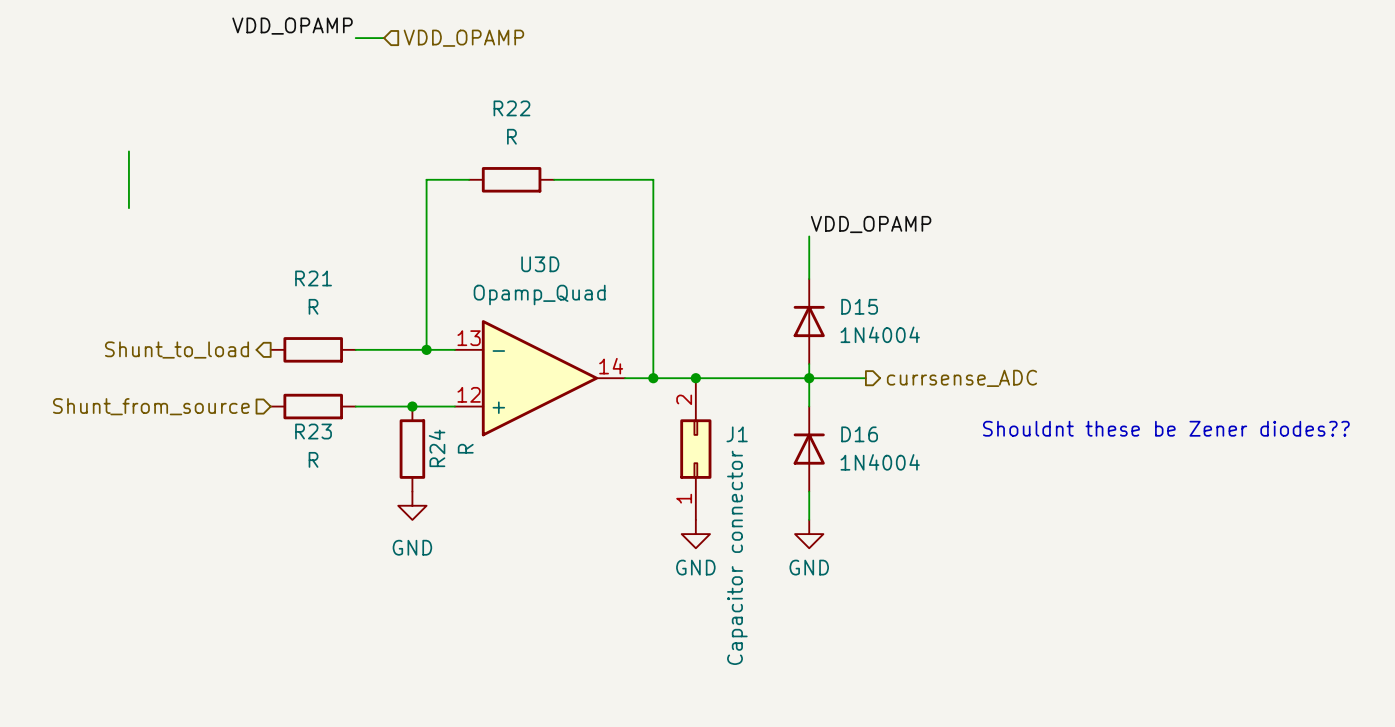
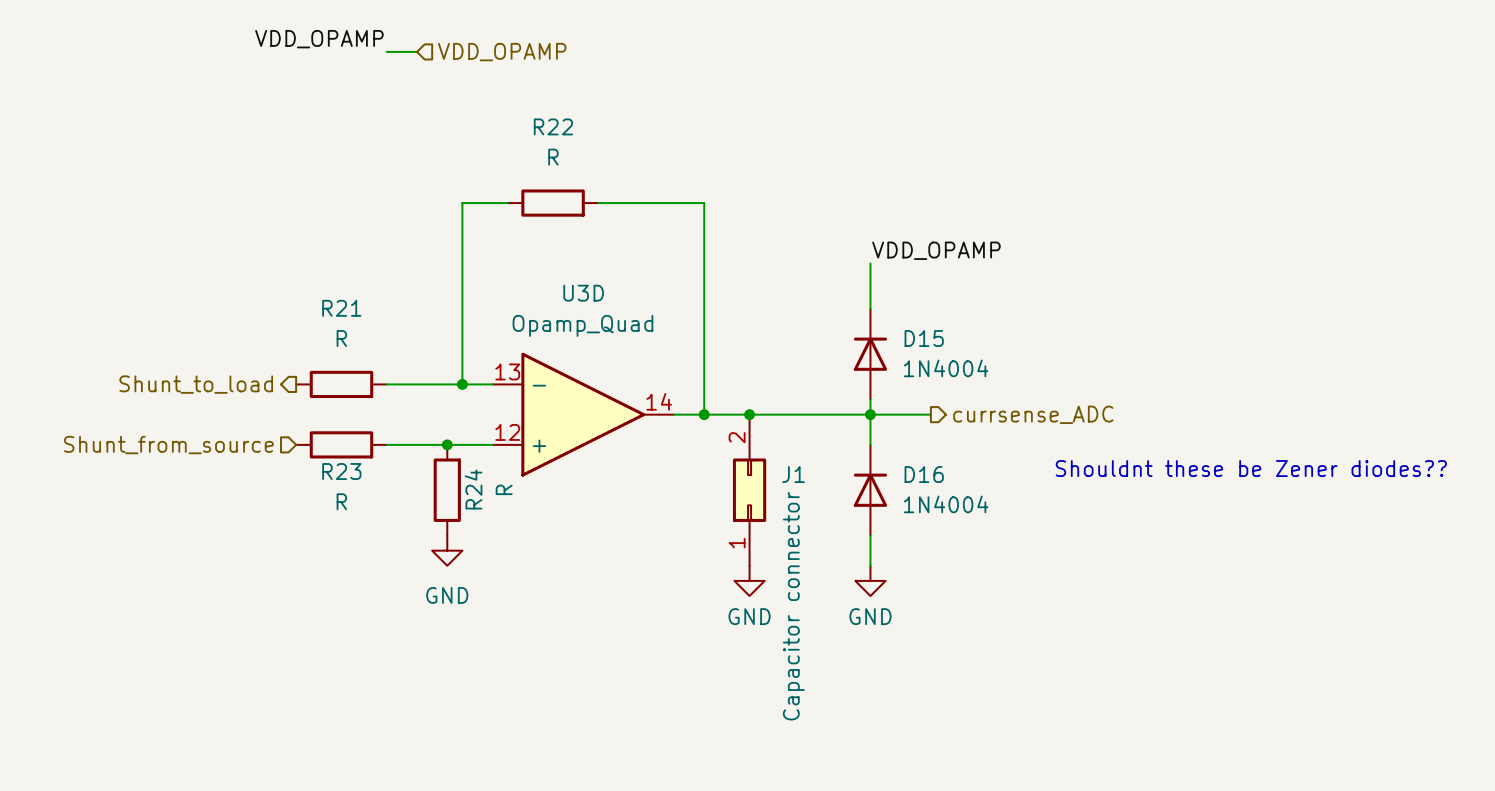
wire: (128, 151) (128, 208) -> none

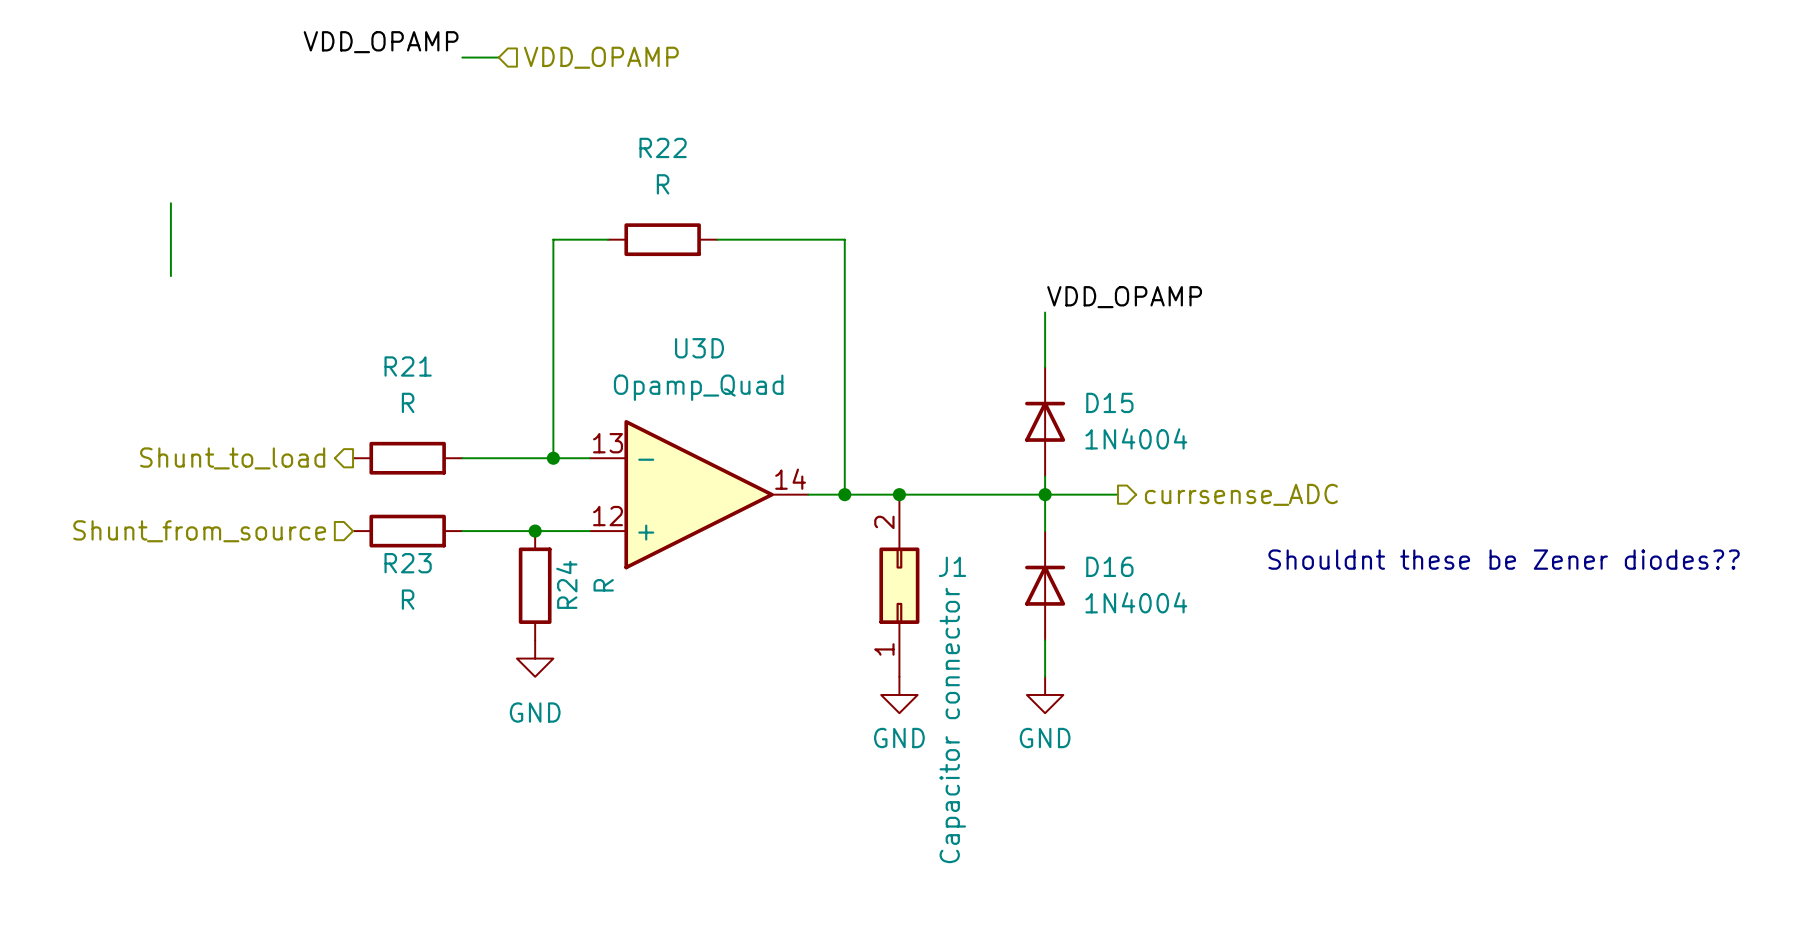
wire: none -> (170, 203) (170, 276)

